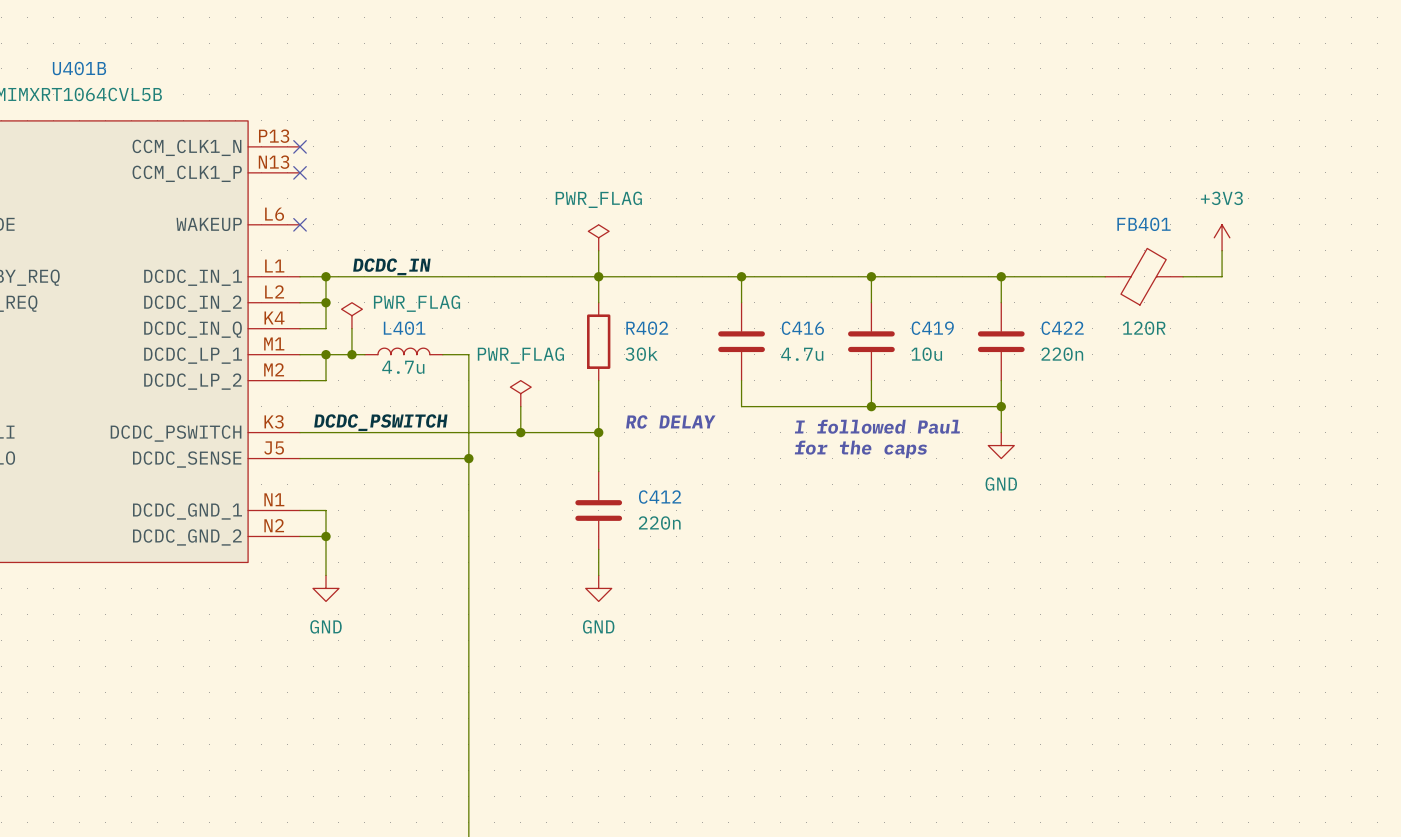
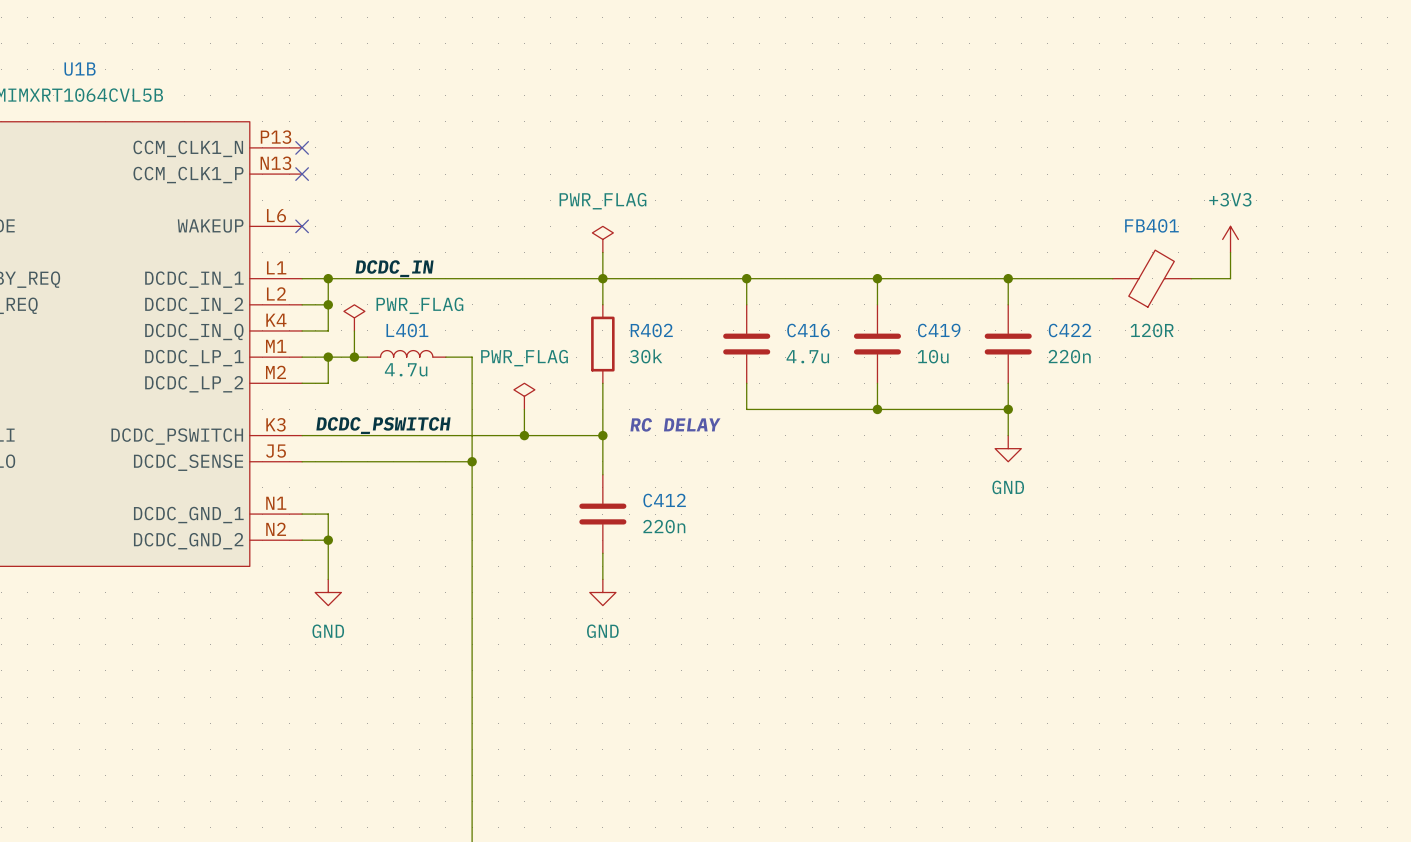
U401B name: U401B (79, 68) -> U1B (80, 69)
text: I followed Paul (877, 426) -> none
text: for the caps (860, 449) -> none

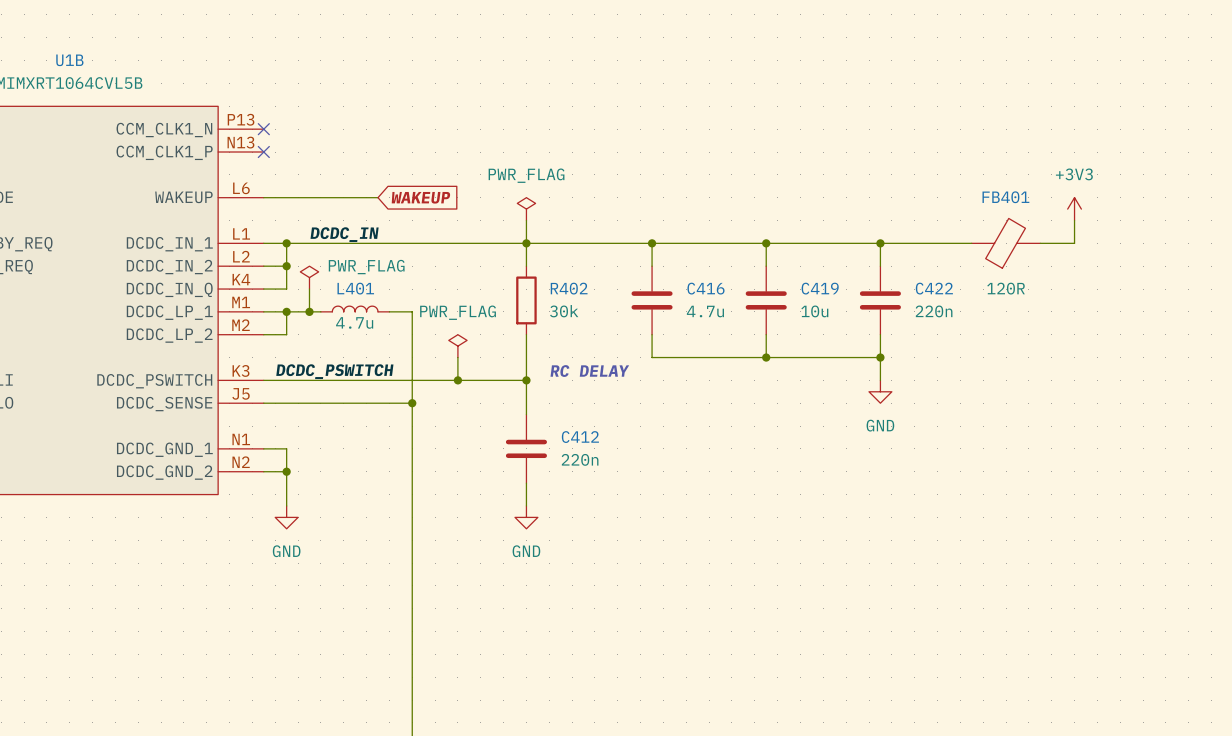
wire: none -> (263, 197) (378, 197)
no-connect mark: (302, 226) -> none
global label: none -> WAKEUP (420, 197)

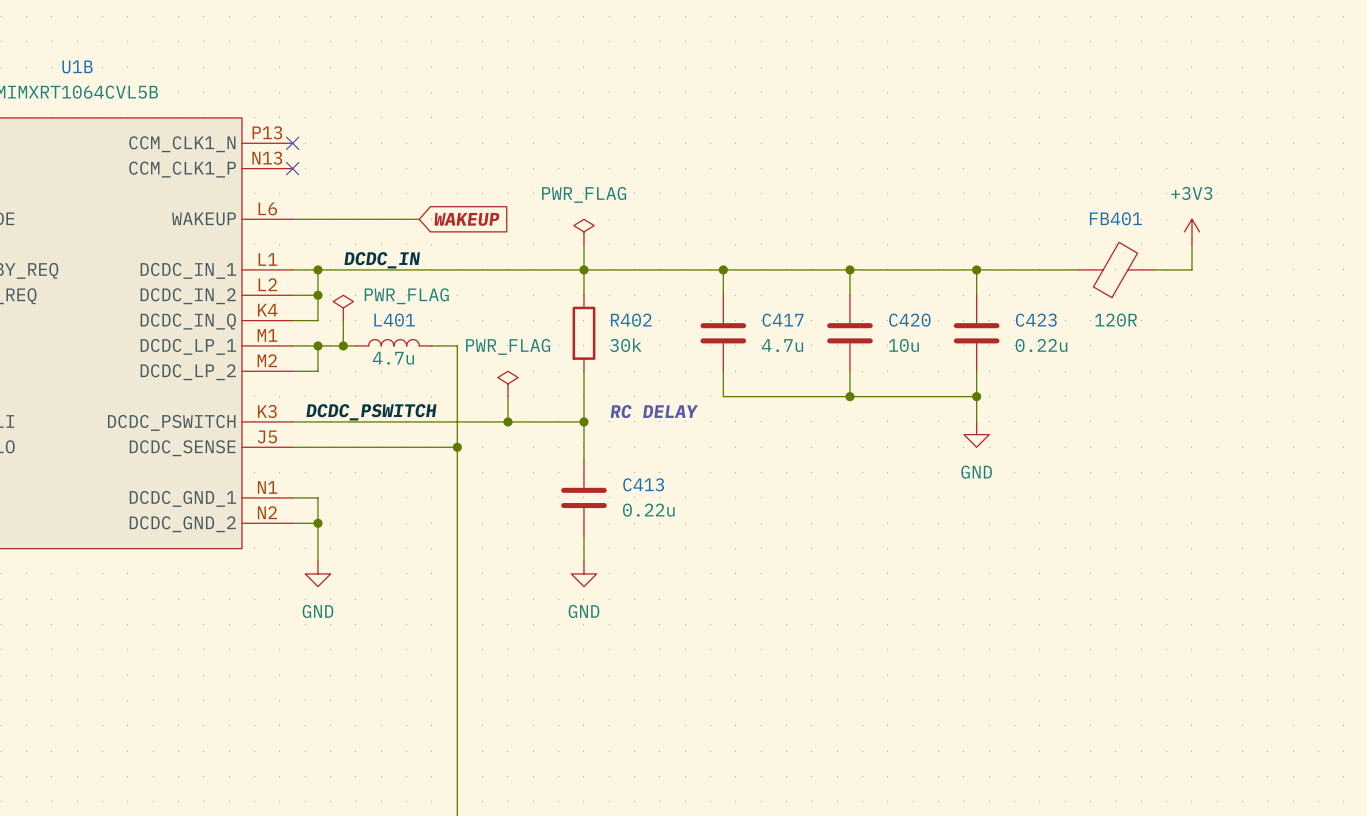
C416 name: C416 (705, 288) -> C417 (783, 320)
C419 name: C419 (820, 288) -> C420 (909, 320)
C422 name: C422 (934, 288) -> C423 (1036, 320)
C422 value: 220n (934, 311) -> 0.22u (1041, 345)
C412 name: C412 (580, 437) -> C413 (643, 484)
C412 value: 220n (580, 459) -> 0.22u (648, 510)

